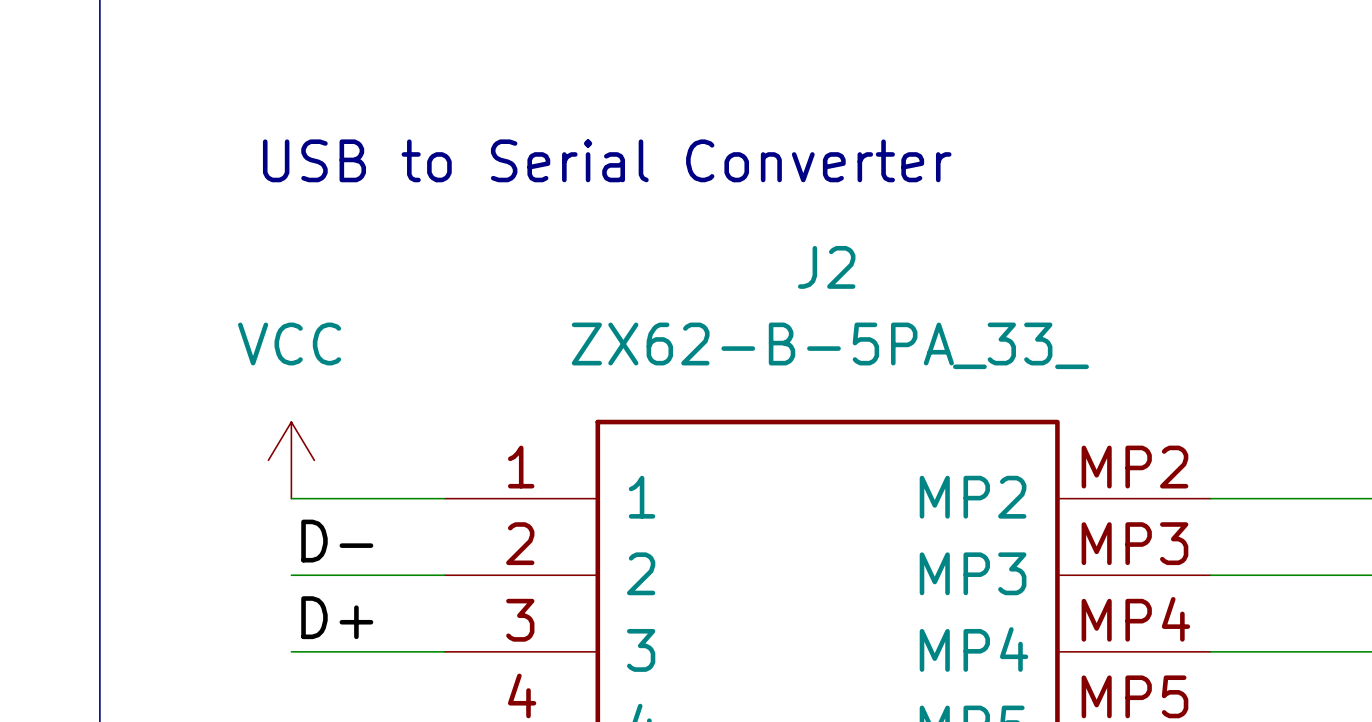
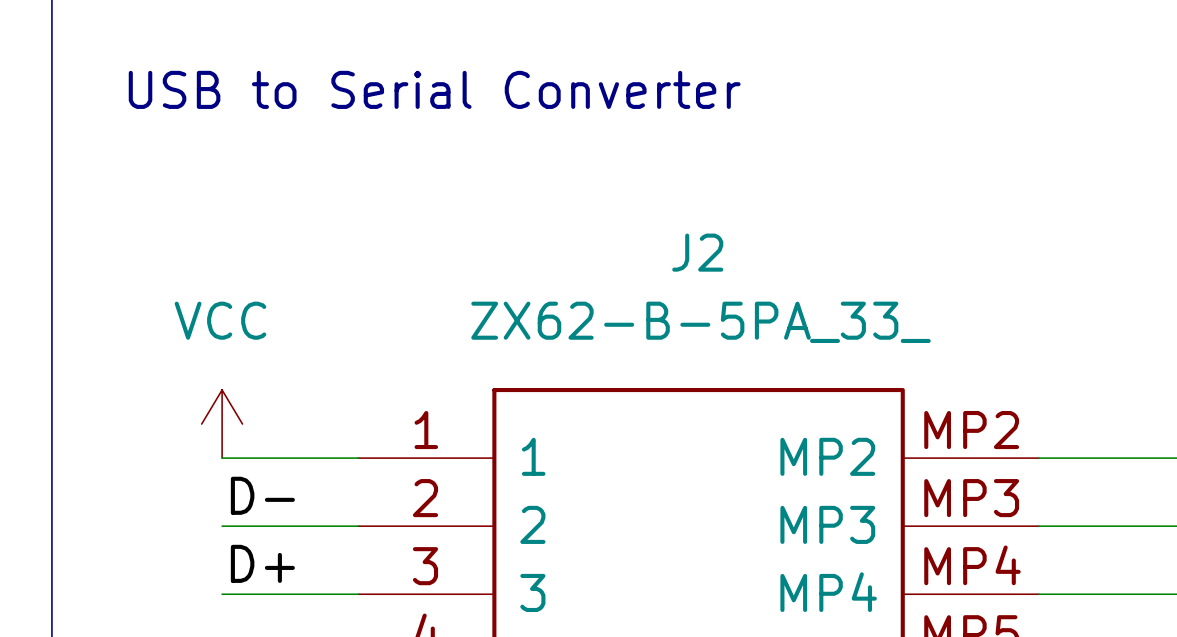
text position: USB to Serial Converter (607, 160) -> USB to Serial Converter (434, 89)

